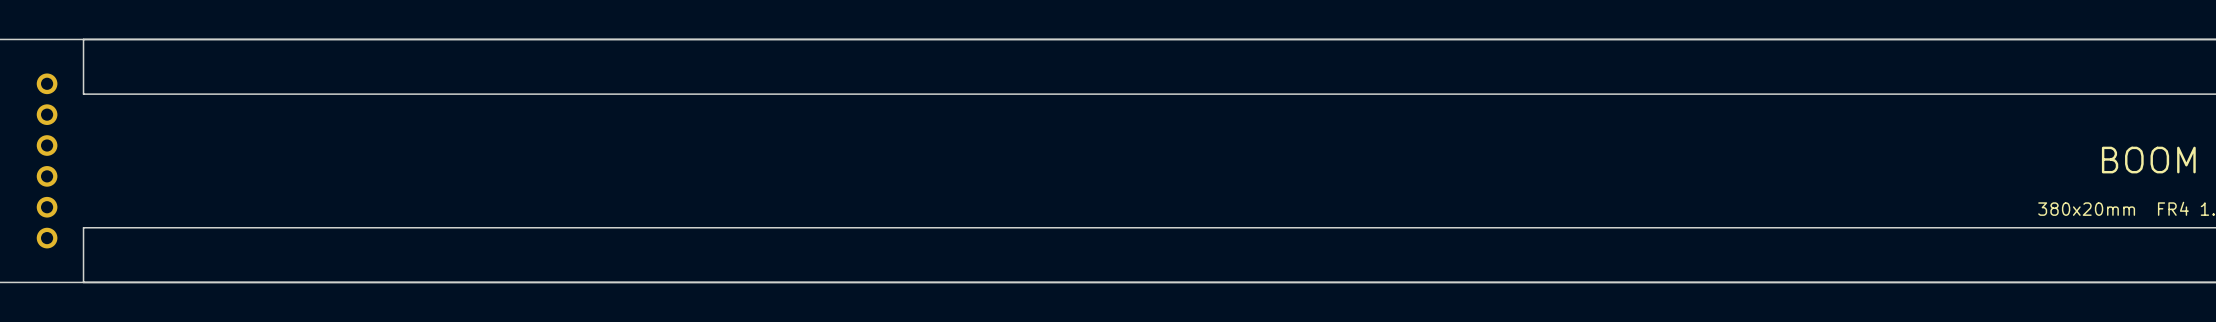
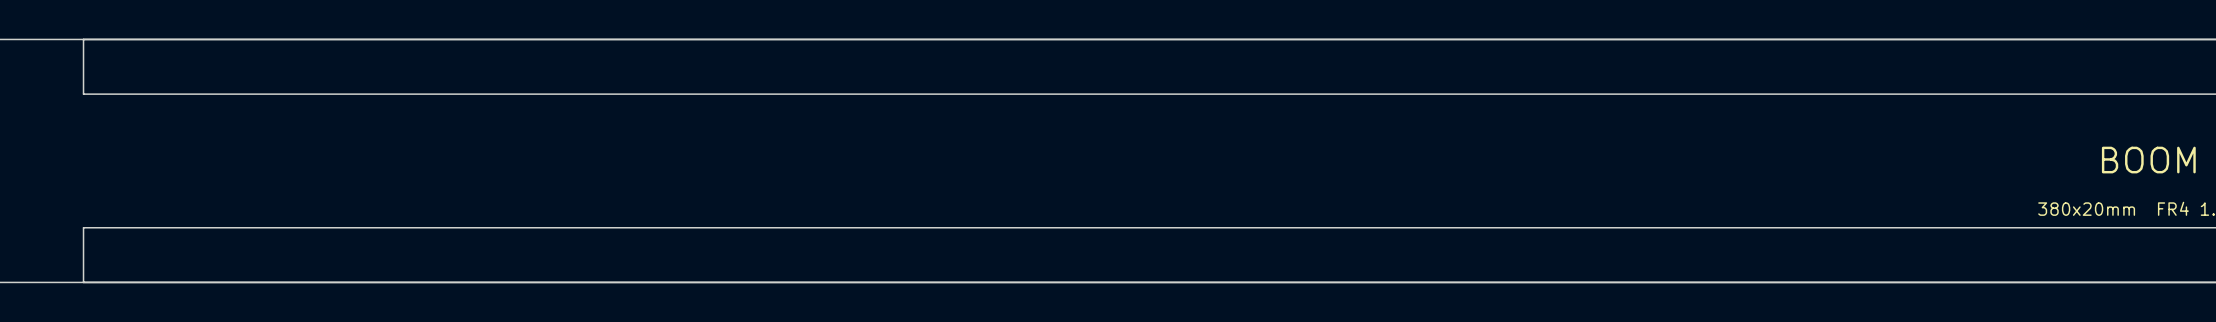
part: (47, 83) -> none
part: (47, 114) -> none
part: (47, 145) -> none
part: (47, 176) -> none
part: (47, 207) -> none
part: (47, 238) -> none

